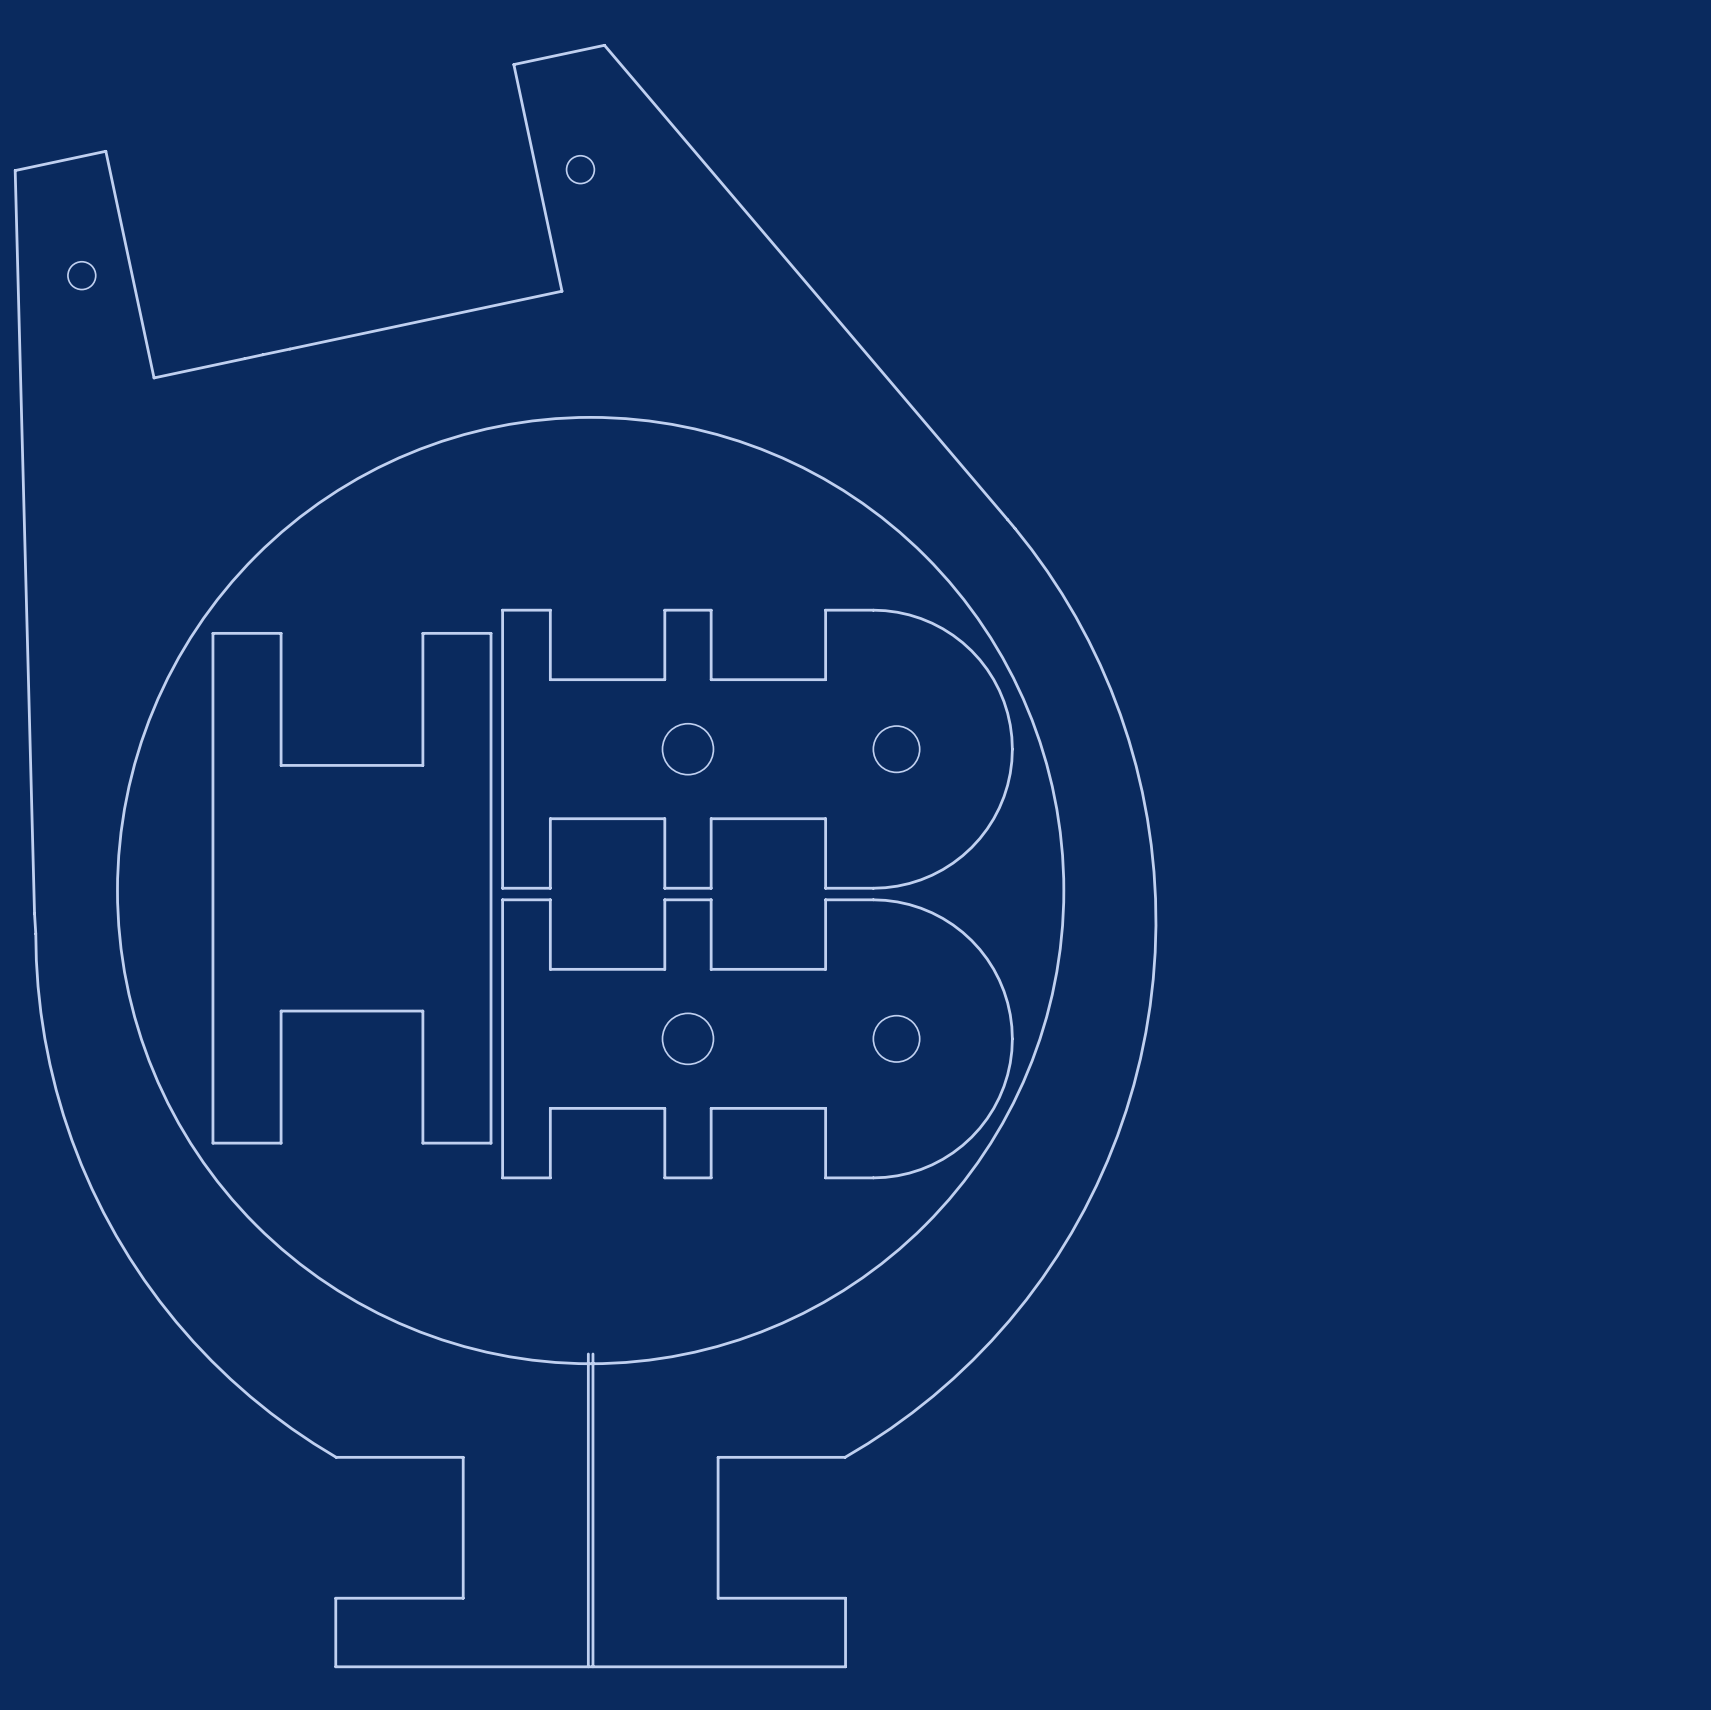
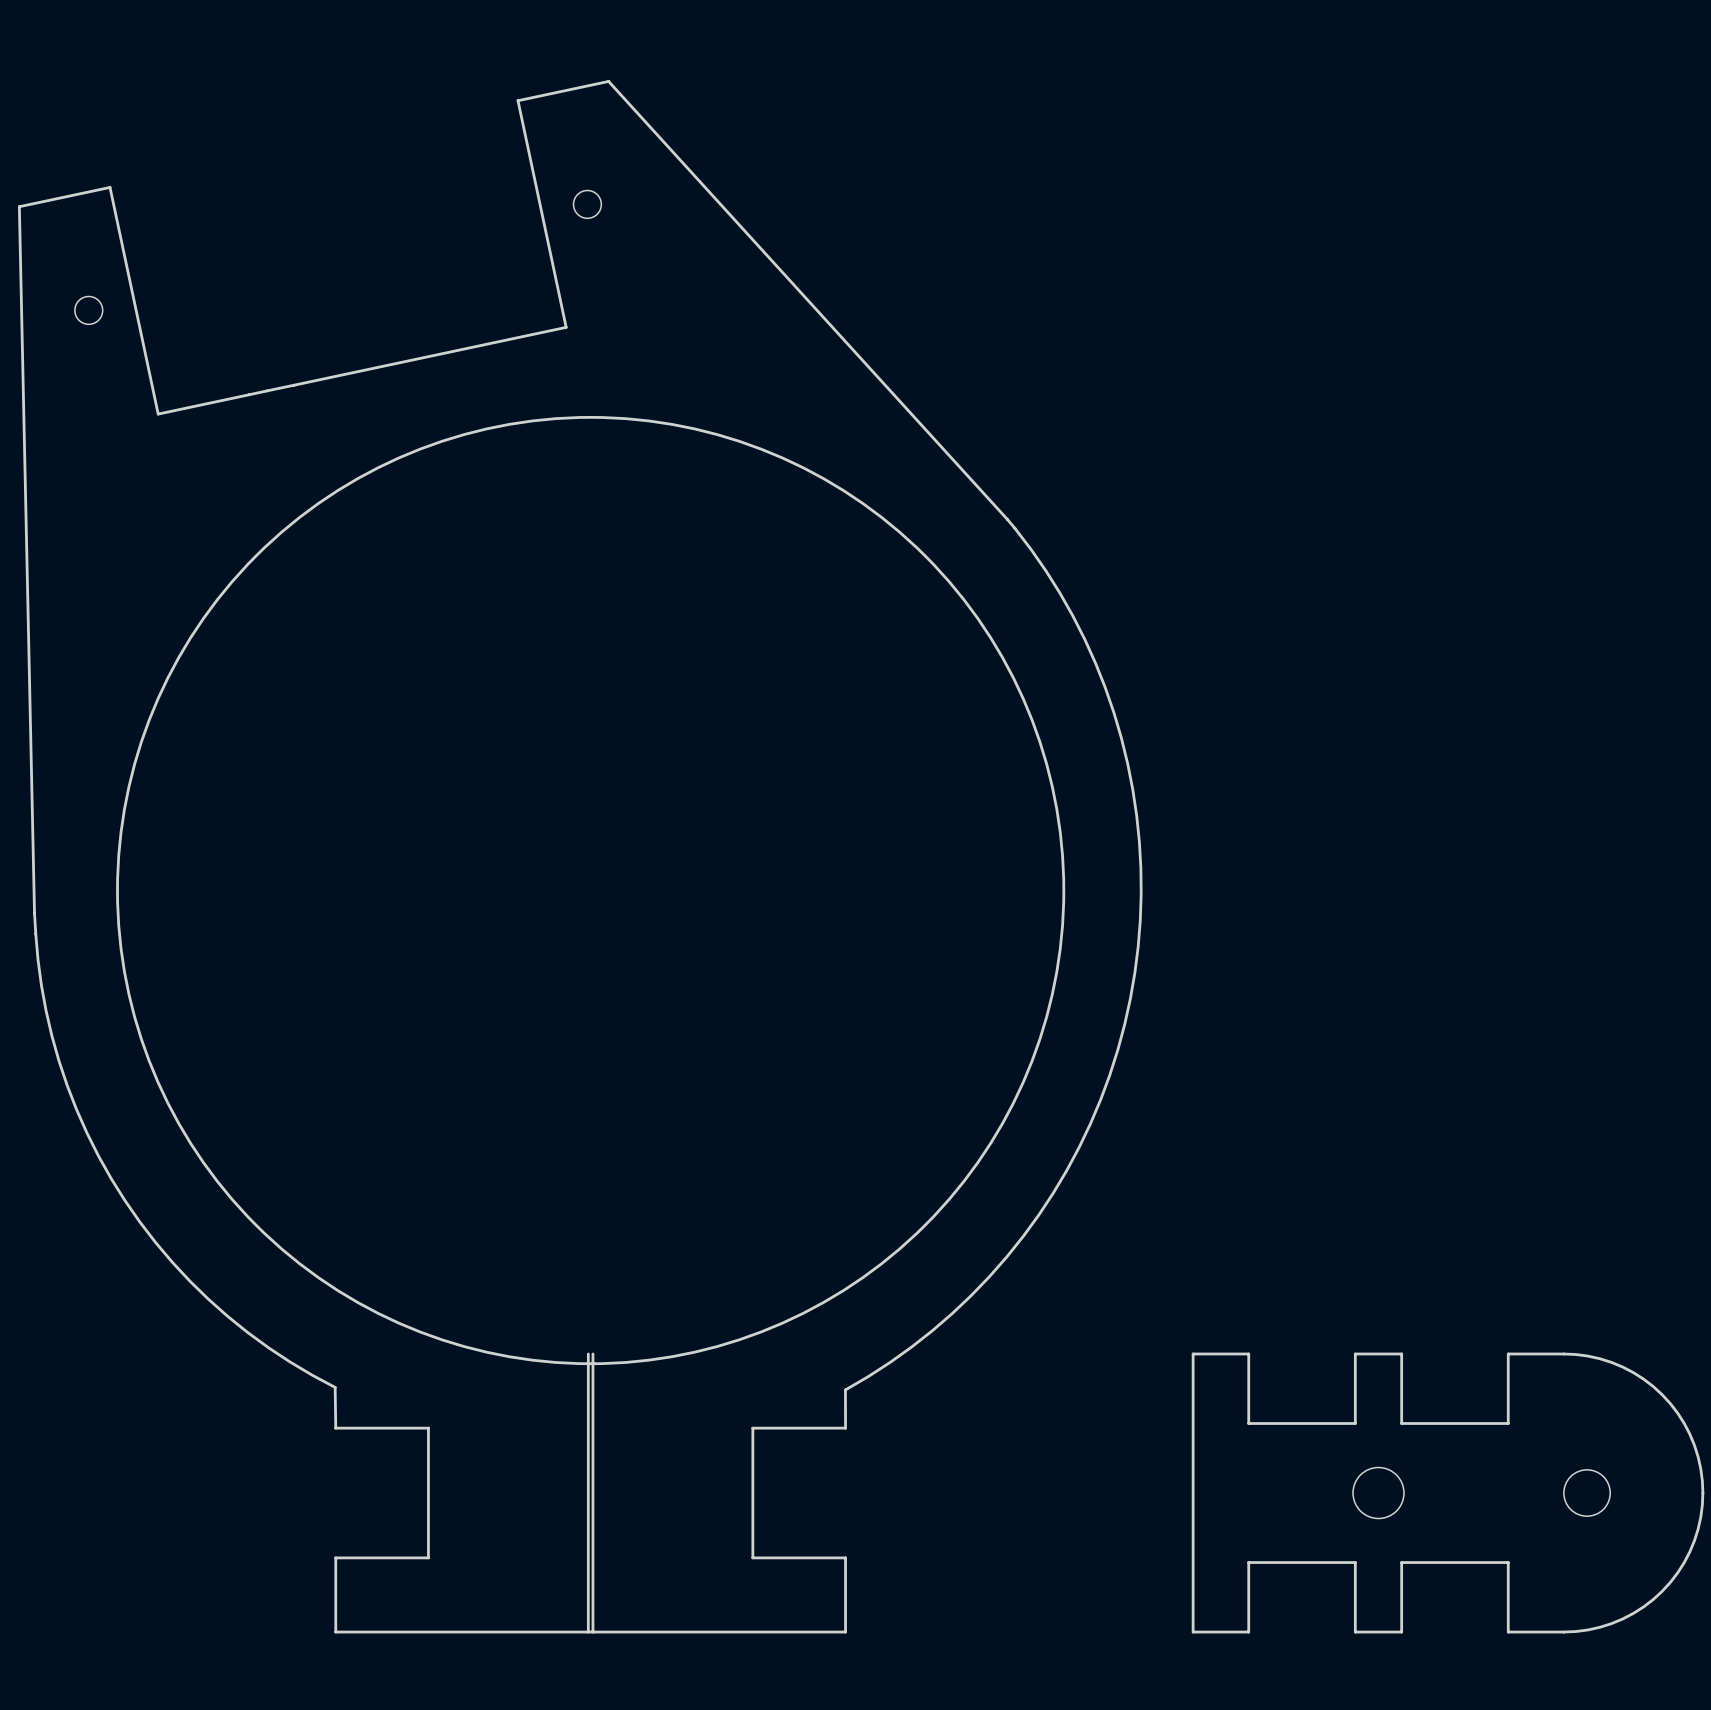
drawing position: (331, 222) -> (338, 257)
board edge: (1007, 519) (604, 45) (513, 64) (562, 291) (154, 377) (105, 151) (15, 170) (34, 913) -> (1007, 519) (608, 81) (518, 100) (566, 327) (158, 414) (110, 187) (19, 206) (34, 913)
board edge: (1015, 528) (1047, 571) (1075, 616) (1100, 664) (1128, 740) (1147, 818) (1154, 871) (1155, 952) (1150, 1005) (1140, 1058) (1126, 1110) (1096, 1185) (1071, 1232) (1042, 1278) (991, 1340) (933, 1396) (890, 1428) (845, 1457) (718, 1457) (718, 1598) (845, 1598) -> (1015, 528) (1046, 571) (1072, 616) (1095, 663) (1121, 738) (1132, 789) (1140, 867) (1140, 920) (1134, 972) (1117, 1049) (1090, 1123) (1053, 1193) (1006, 1256) (971, 1295) (932, 1330) (890, 1362) (845, 1389) (845, 1428) (752, 1428) (752, 1557) (845, 1557) (845, 1598)
board edge: (502, 610) (502, 888) (550, 888) (550, 818) (664, 818) (664, 888) (711, 888) (711, 818) (825, 818) (825, 888) (897, 886) (932, 875) (962, 855) (987, 828) (1004, 796) (1010, 773) (1012, 749) (1007, 713) (999, 690) (987, 669) (971, 650) (942, 628) (920, 618) (885, 610) (825, 610) (825, 679) (711, 679) (711, 610) (664, 610) (664, 679) (550, 679) (550, 610) (502, 610) -> none
board edge: (212, 633) (281, 633) (281, 765) (422, 765) (422, 633) (491, 633) (491, 1143) (422, 1143) (422, 1011) (281, 1011) (281, 1143) (212, 1143) (212, 633) -> none
round board edge: [661, 723, 715, 776] -> none
round board edge: [872, 725, 921, 774] -> none
board edge: (502, 899) (502, 1177) (550, 1177) (550, 1108) (664, 1108) (664, 1177) (711, 1177) (711, 1108) (825, 1108) (825, 1177) (897, 1175) (932, 1164) (962, 1145) (987, 1118) (1004, 1086) (1010, 1062) (1012, 1038) (1007, 1002) (999, 980) (987, 959) (971, 940) (942, 918) (920, 908) (885, 900) (825, 899) (825, 969) (711, 969) (711, 899) (664, 899) (664, 969) (550, 969) (550, 899) (502, 899) -> none
board edge: (35, 933) (38, 986) (44, 1038) (56, 1090) (71, 1140) (91, 1188) (116, 1235) (144, 1280) (176, 1322) (211, 1360) (250, 1396) (291, 1428) (336, 1457) (463, 1457) (463, 1598) (335, 1598) -> (35, 933) (46, 1010) (58, 1060) (76, 1109) (111, 1178) (155, 1242) (208, 1299) (247, 1332) (290, 1362) (335, 1387) (335, 1428) (428, 1428) (428, 1557) (335, 1557) (335, 1598)
round board edge: [661, 1012, 715, 1066] -> none
round board edge: [872, 1014, 921, 1063] -> none
board edge: none -> (1193, 1353) (1193, 1632) (1248, 1632) (1248, 1562) (1355, 1562) (1355, 1632) (1401, 1632) (1401, 1562) (1508, 1562) (1508, 1632) (1588, 1629) (1622, 1619) (1653, 1599) (1677, 1572) (1694, 1540) (1700, 1517) (1702, 1493) (1698, 1457) (1689, 1434) (1677, 1413) (1662, 1394) (1633, 1372) (1611, 1362) (1575, 1354) (1508, 1353) (1508, 1423) (1401, 1423) (1401, 1353) (1355, 1353) (1355, 1423) (1248, 1423) (1248, 1353) (1193, 1353)
round board edge: none -> [1352, 1466, 1405, 1520]
round board edge: none -> [1563, 1469, 1611, 1517]
board edge: (335, 1632) (335, 1666) (845, 1666) (845, 1632) -> (335, 1632) (845, 1632)
board edge: (588, 1632) (588, 1666) -> none
board edge: (592, 1632) (592, 1666) -> none

